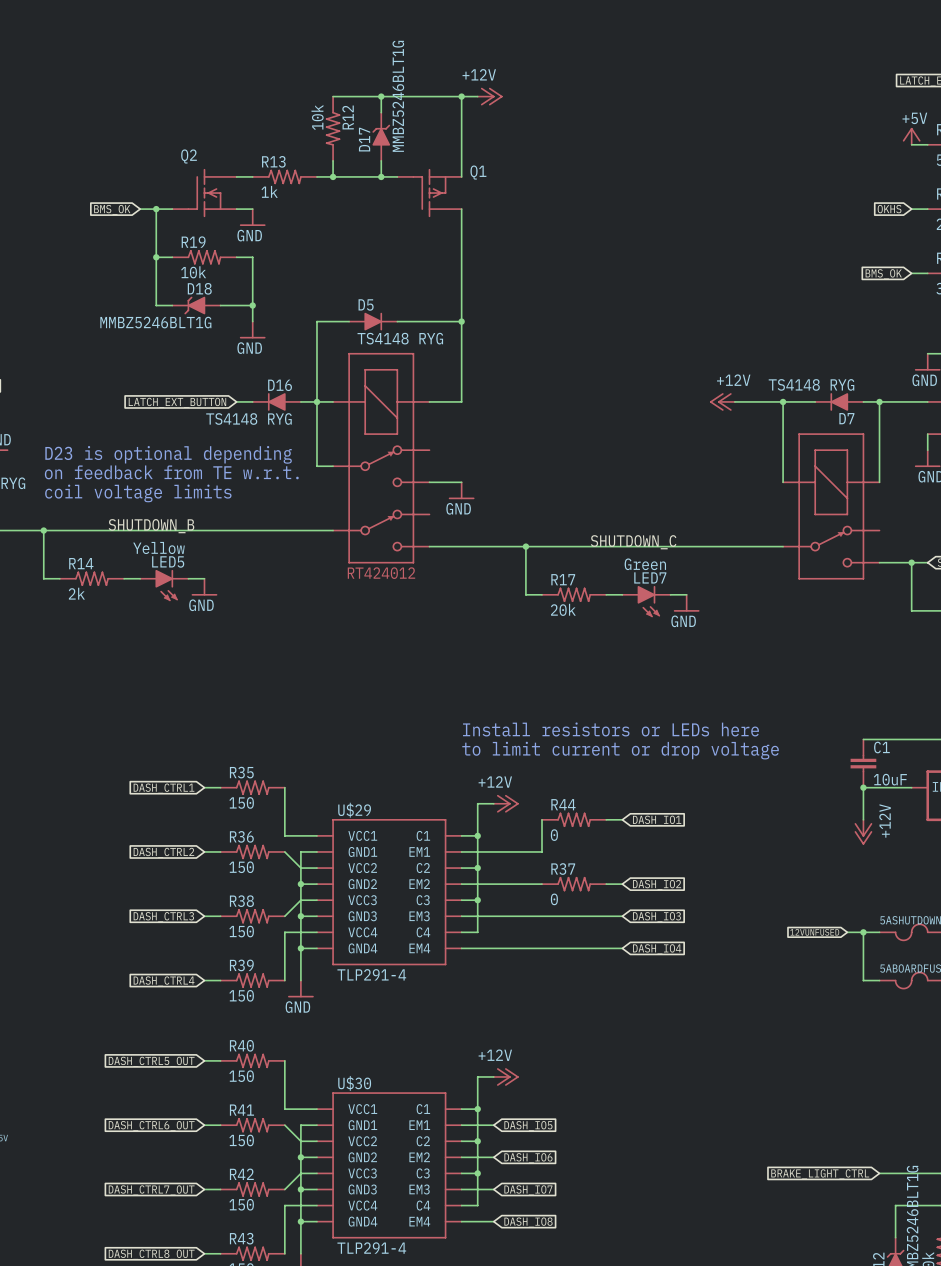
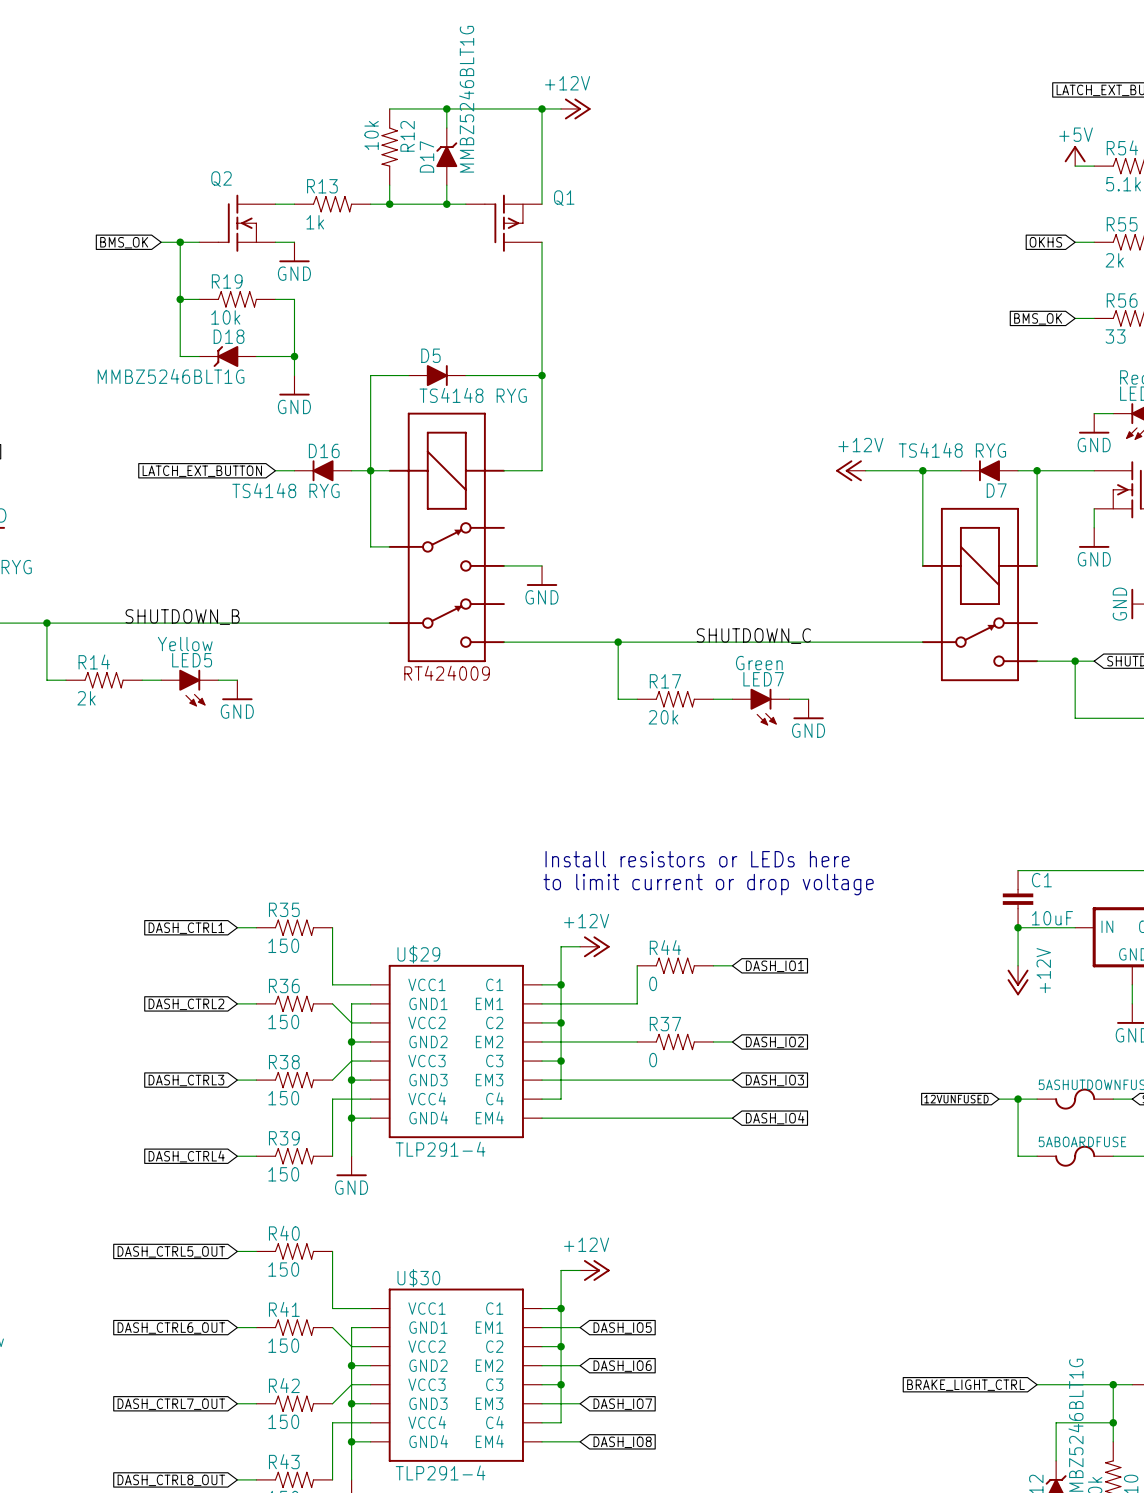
text: D23 is optional depending (168, 454) -> none
text: on feedback from TE w.r.t. (171, 472) -> none
text: coil voltage limits (138, 493) -> none
part value: RT424012 (381, 573) -> RT424009 (447, 673)

